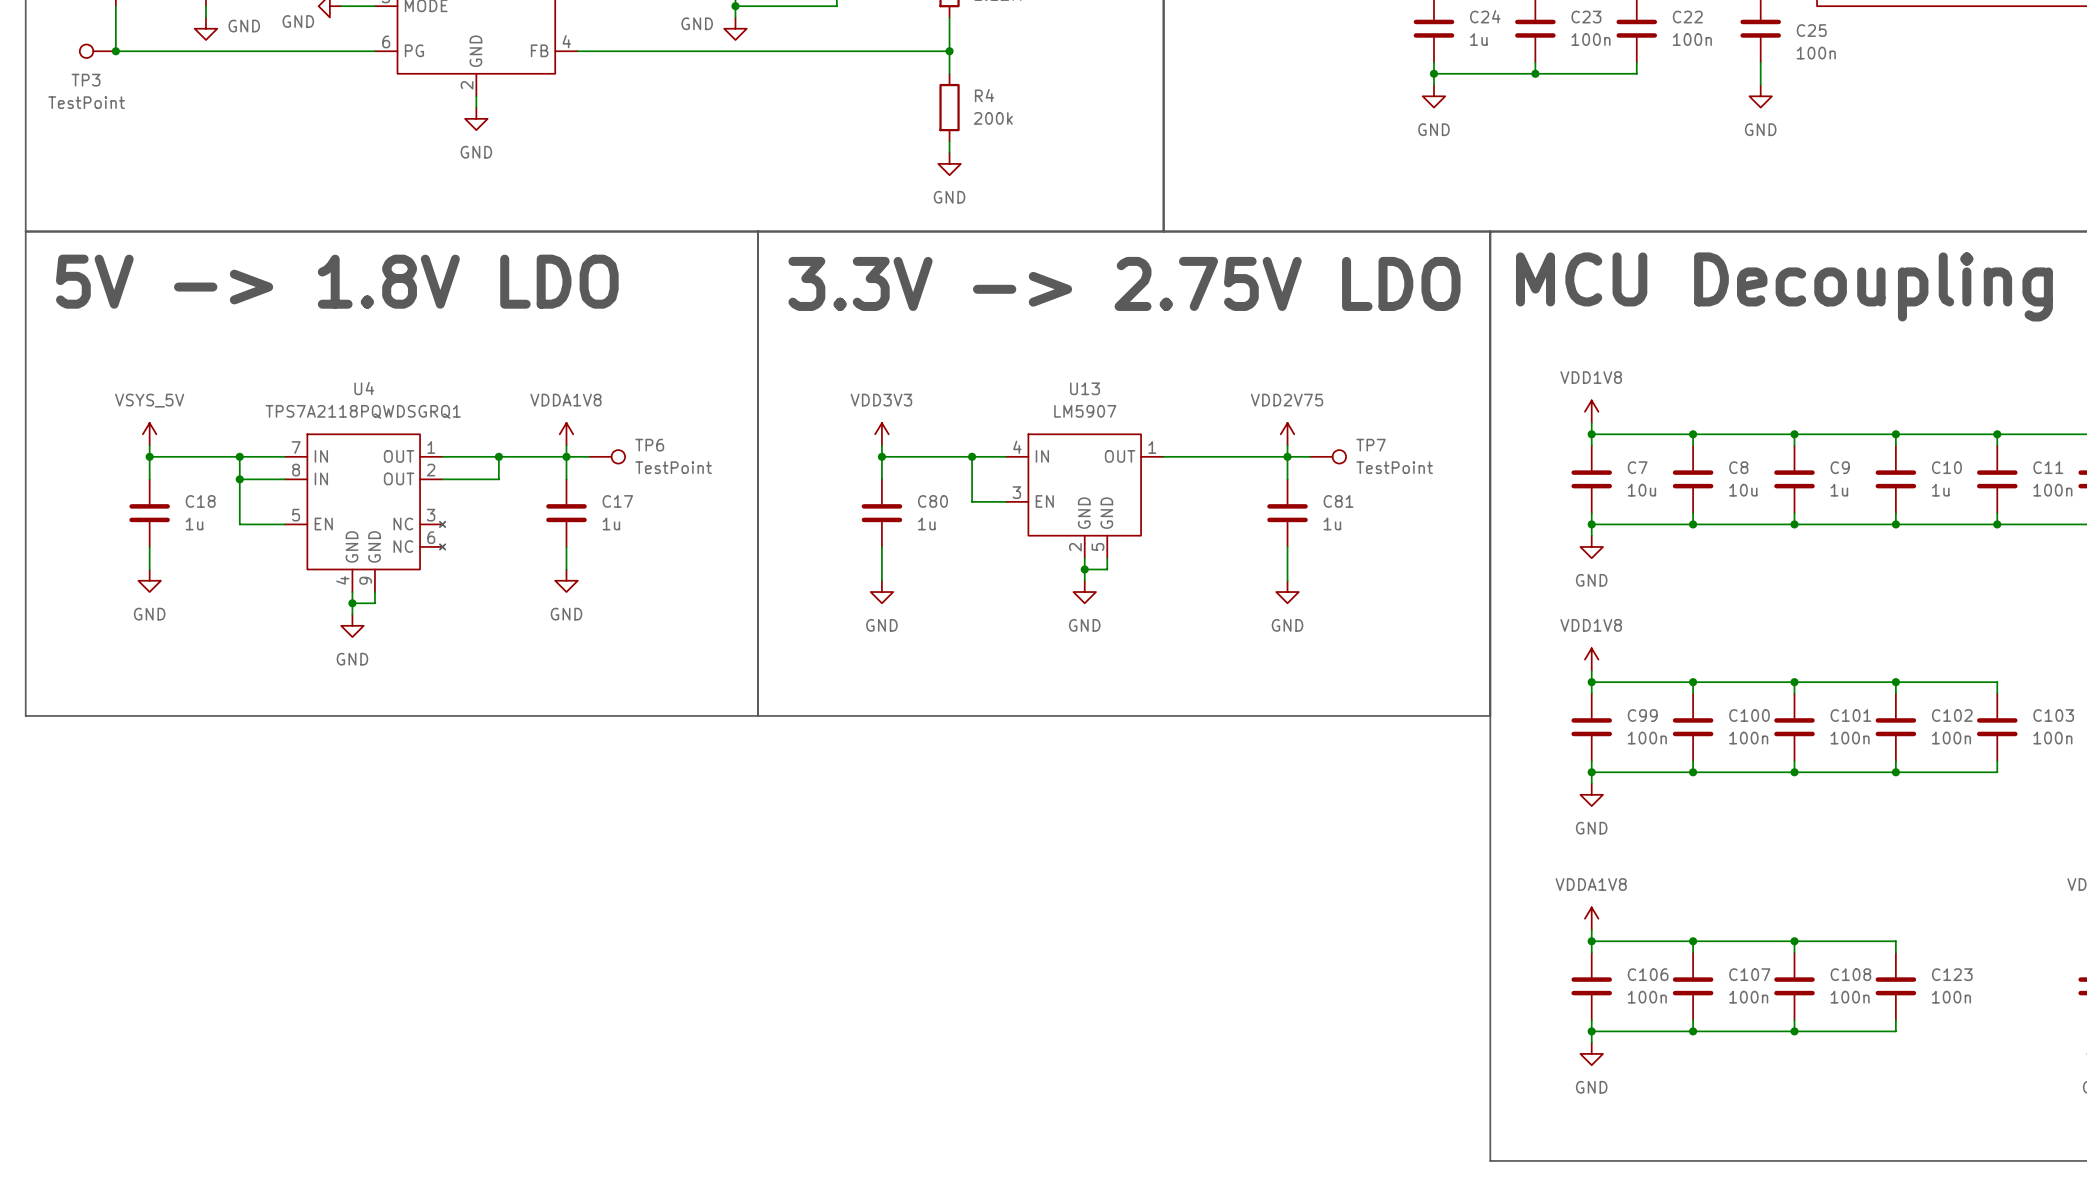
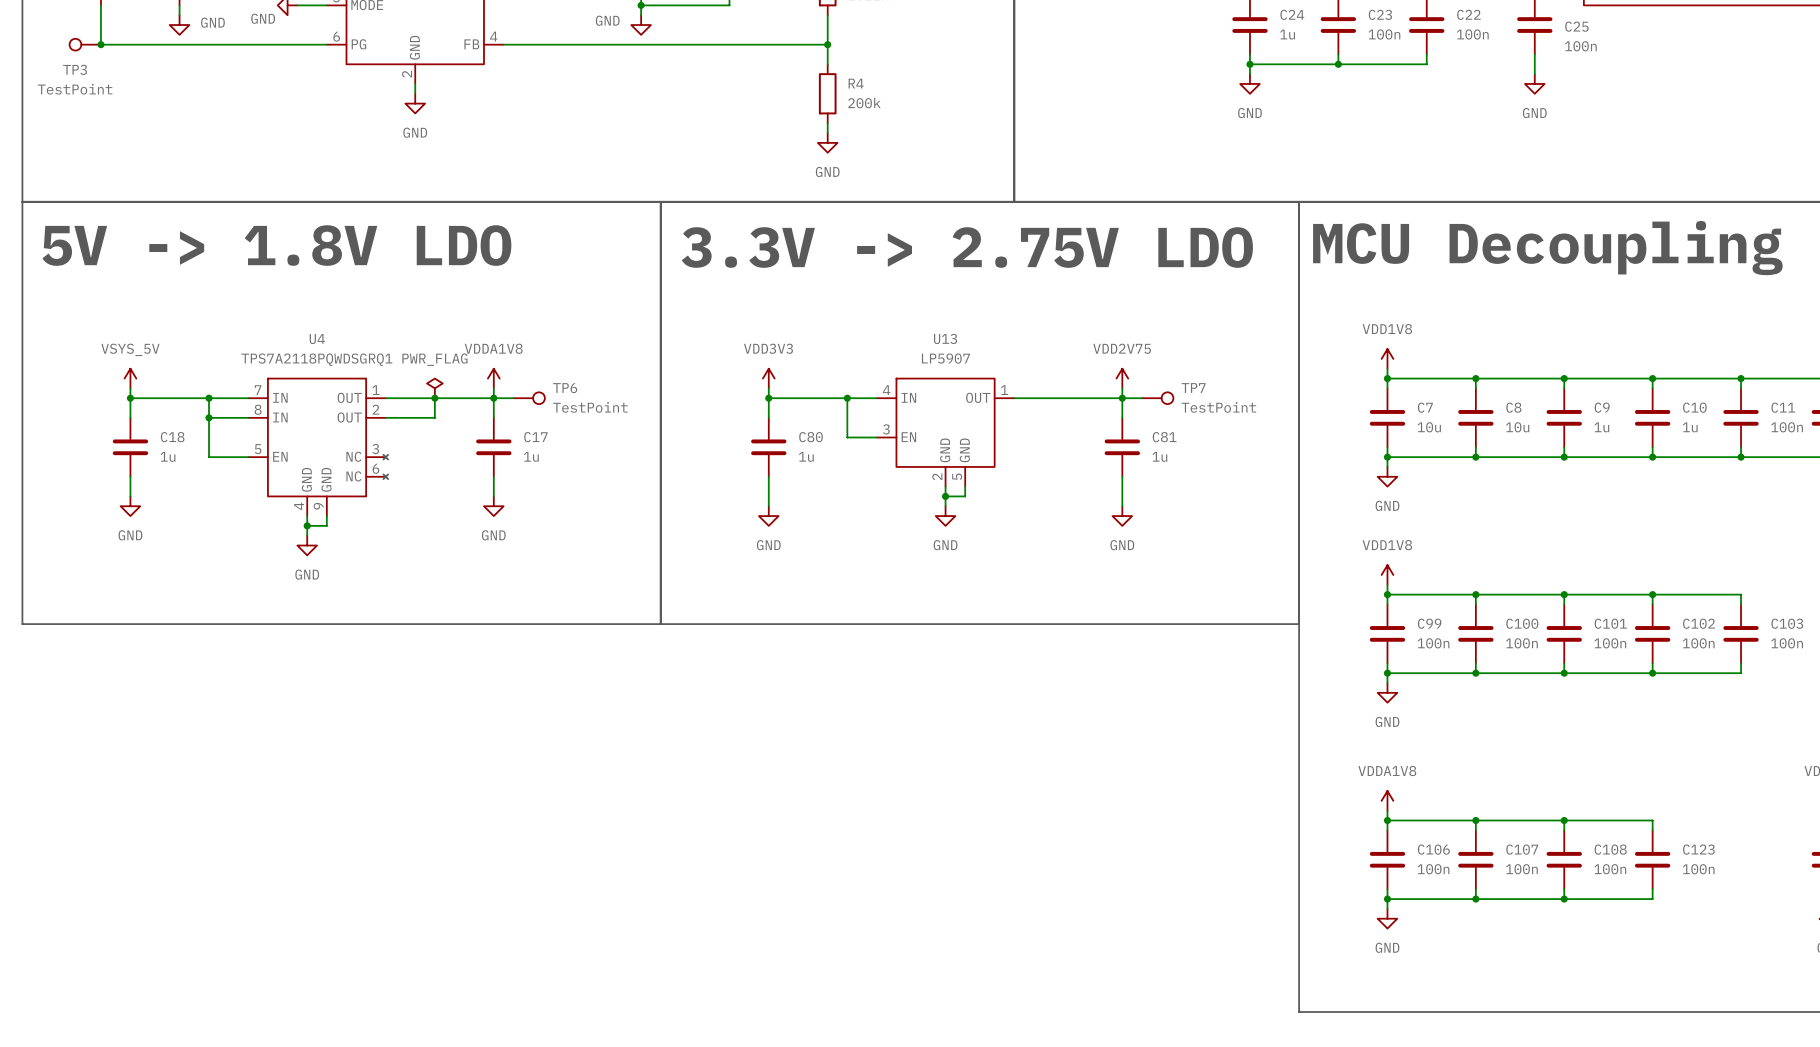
U13 value: LM5907 (1085, 411) -> LP5907 (945, 358)
power symbol: none -> PWR_FLAG (434, 388)

